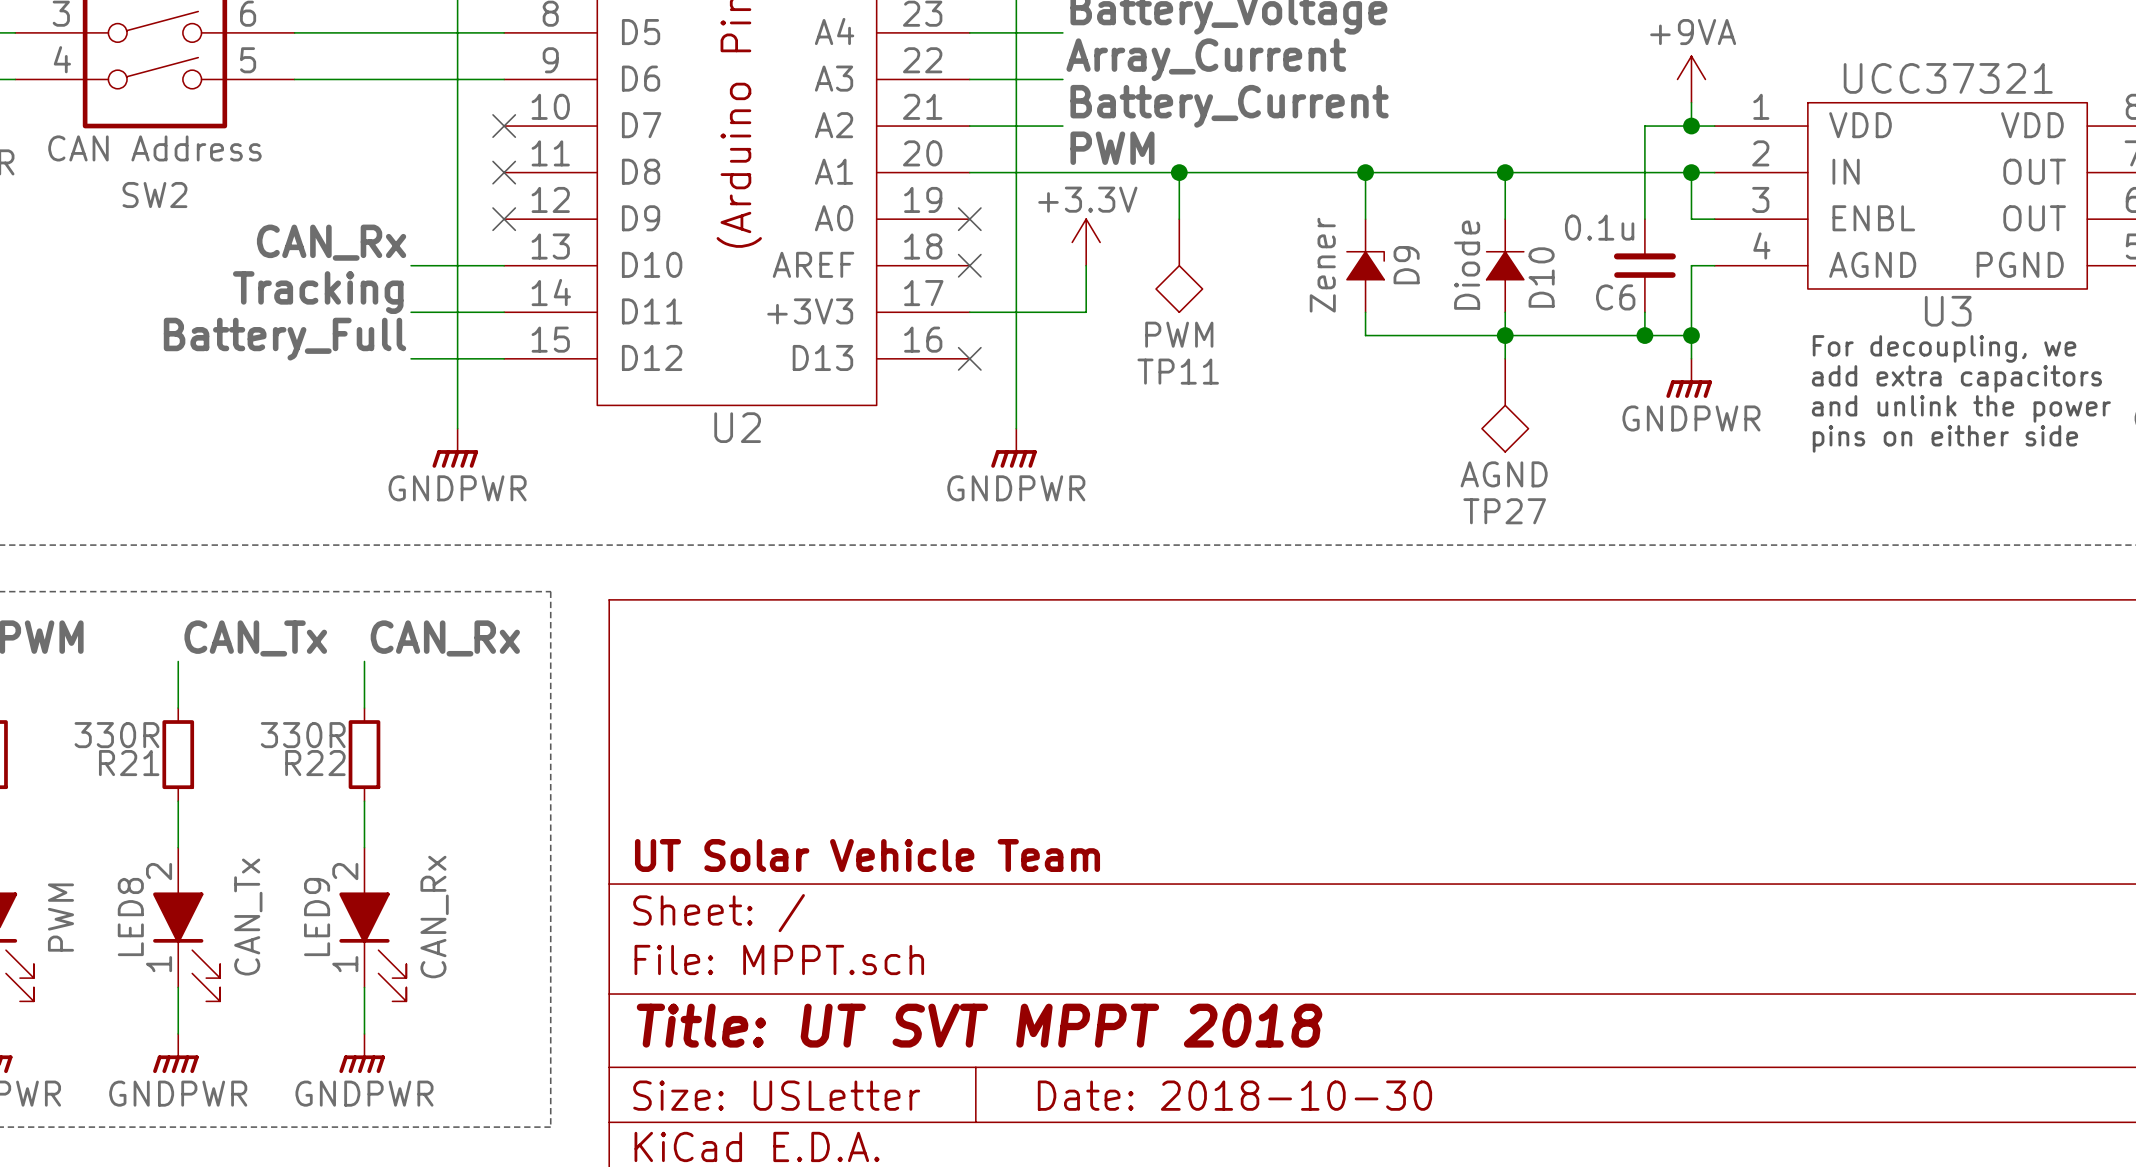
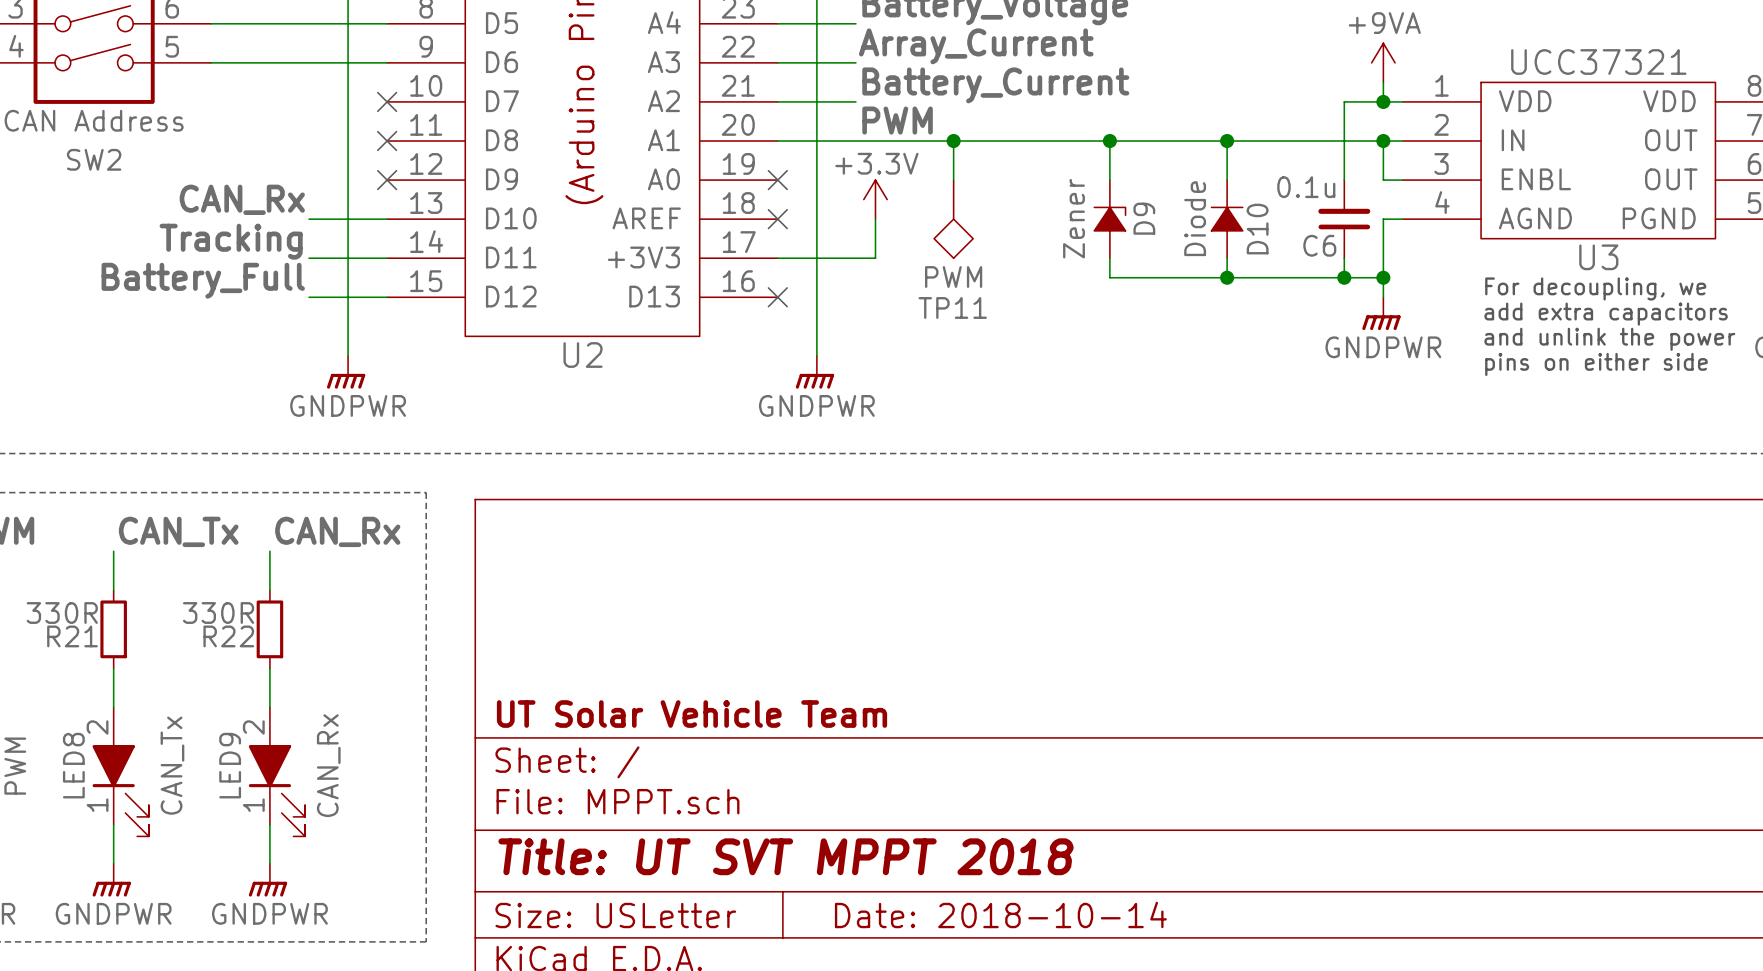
wire: (1505, 335) (1505, 358) -> none
TP27: AGND (1505, 405) -> none
title block: Date: 2018-10-30 (1234, 1095) -> Date: 2018-10-14 (1000, 914)

